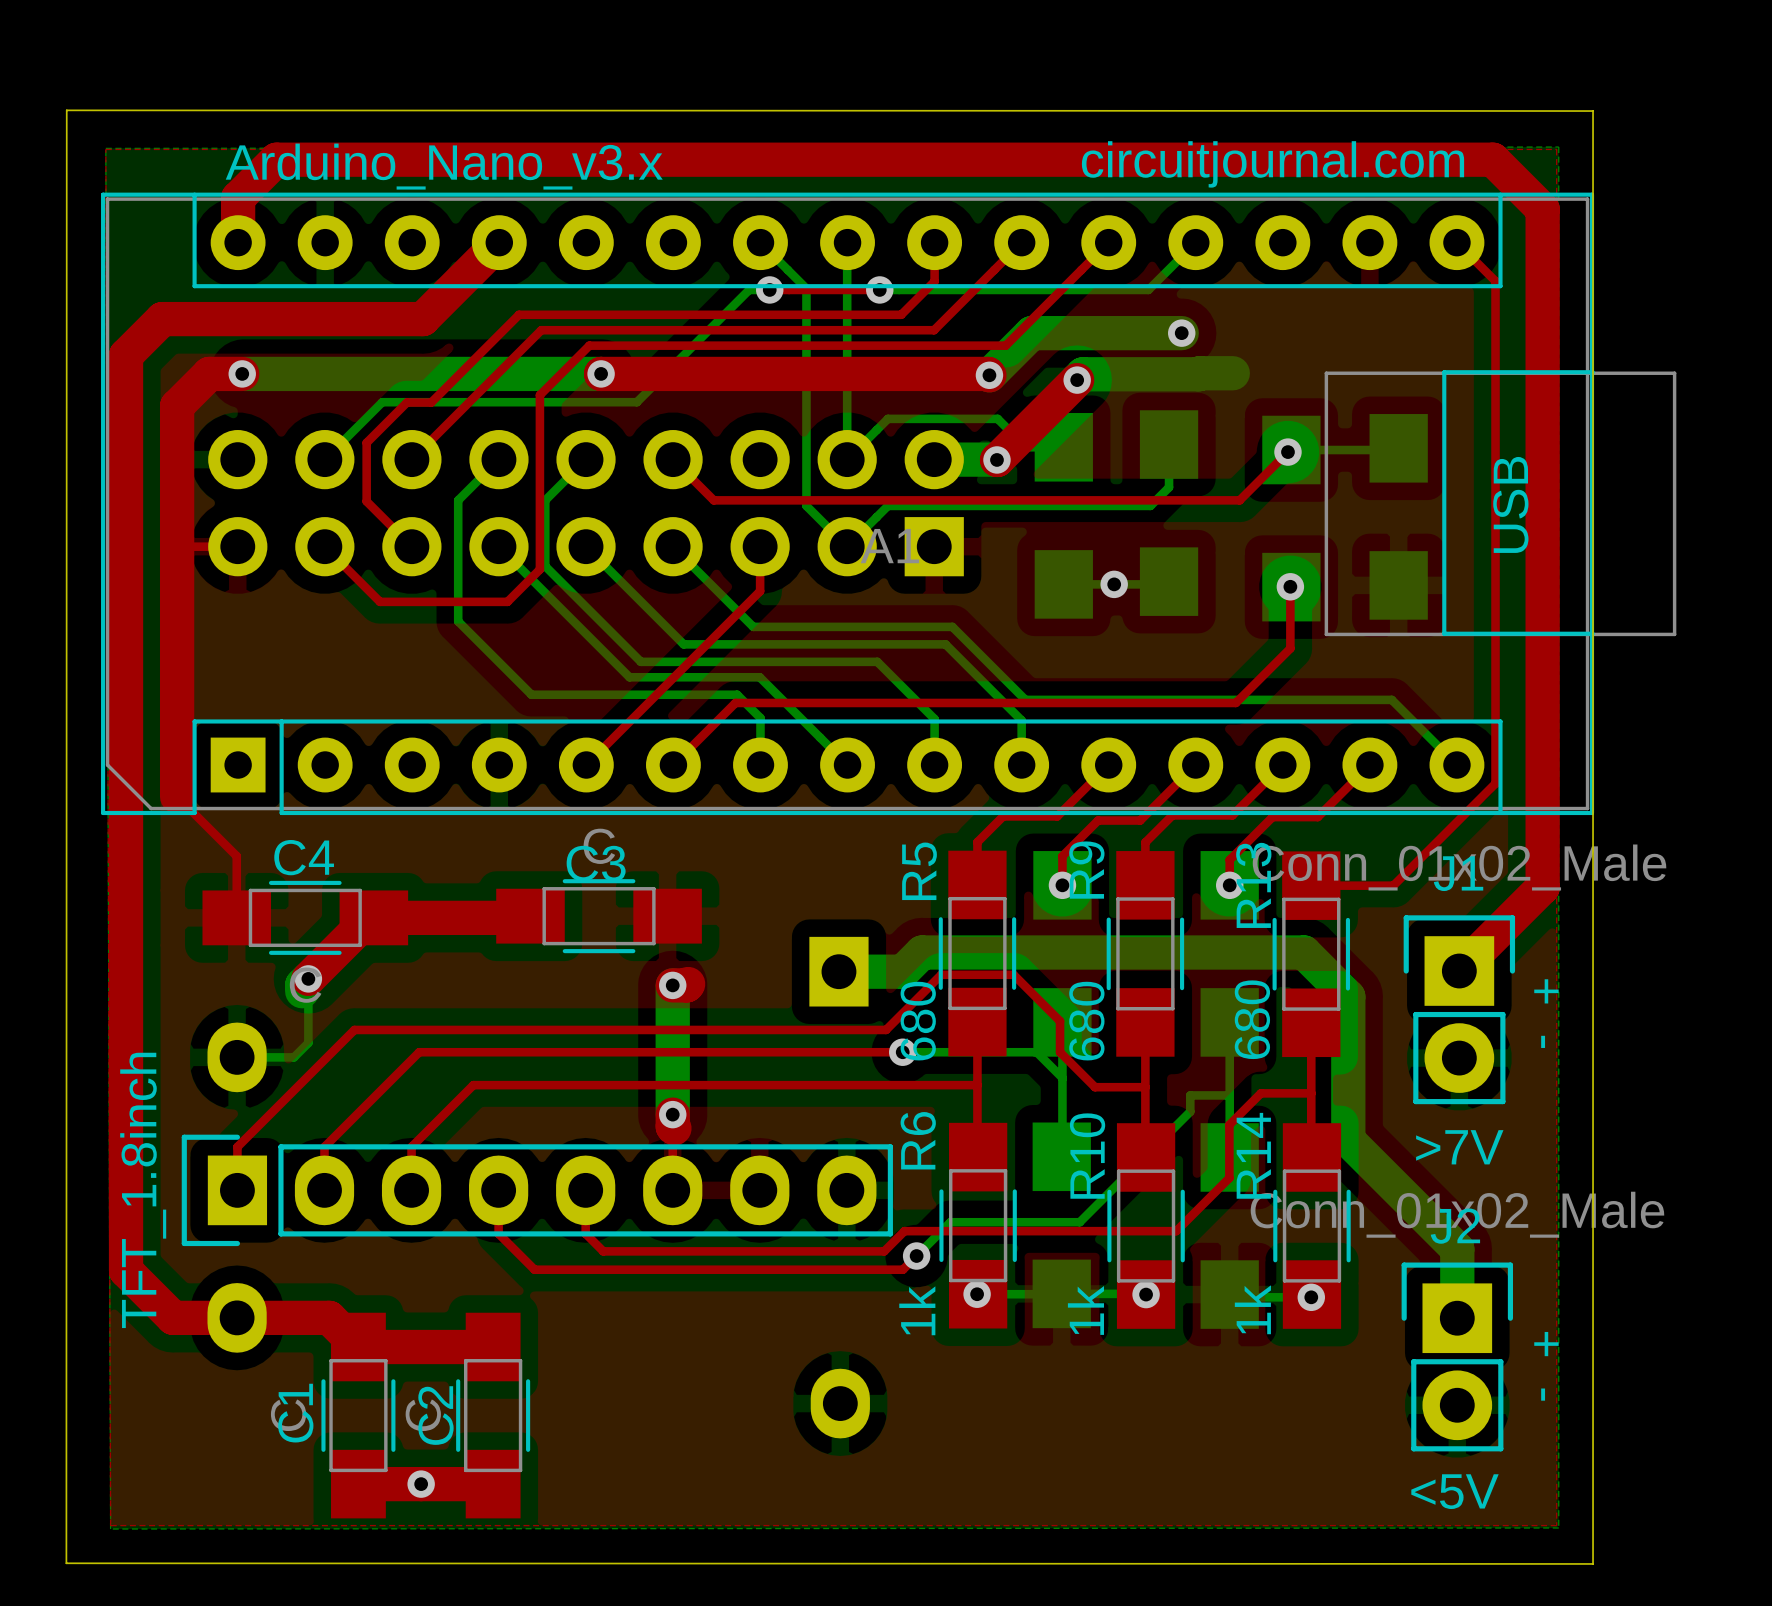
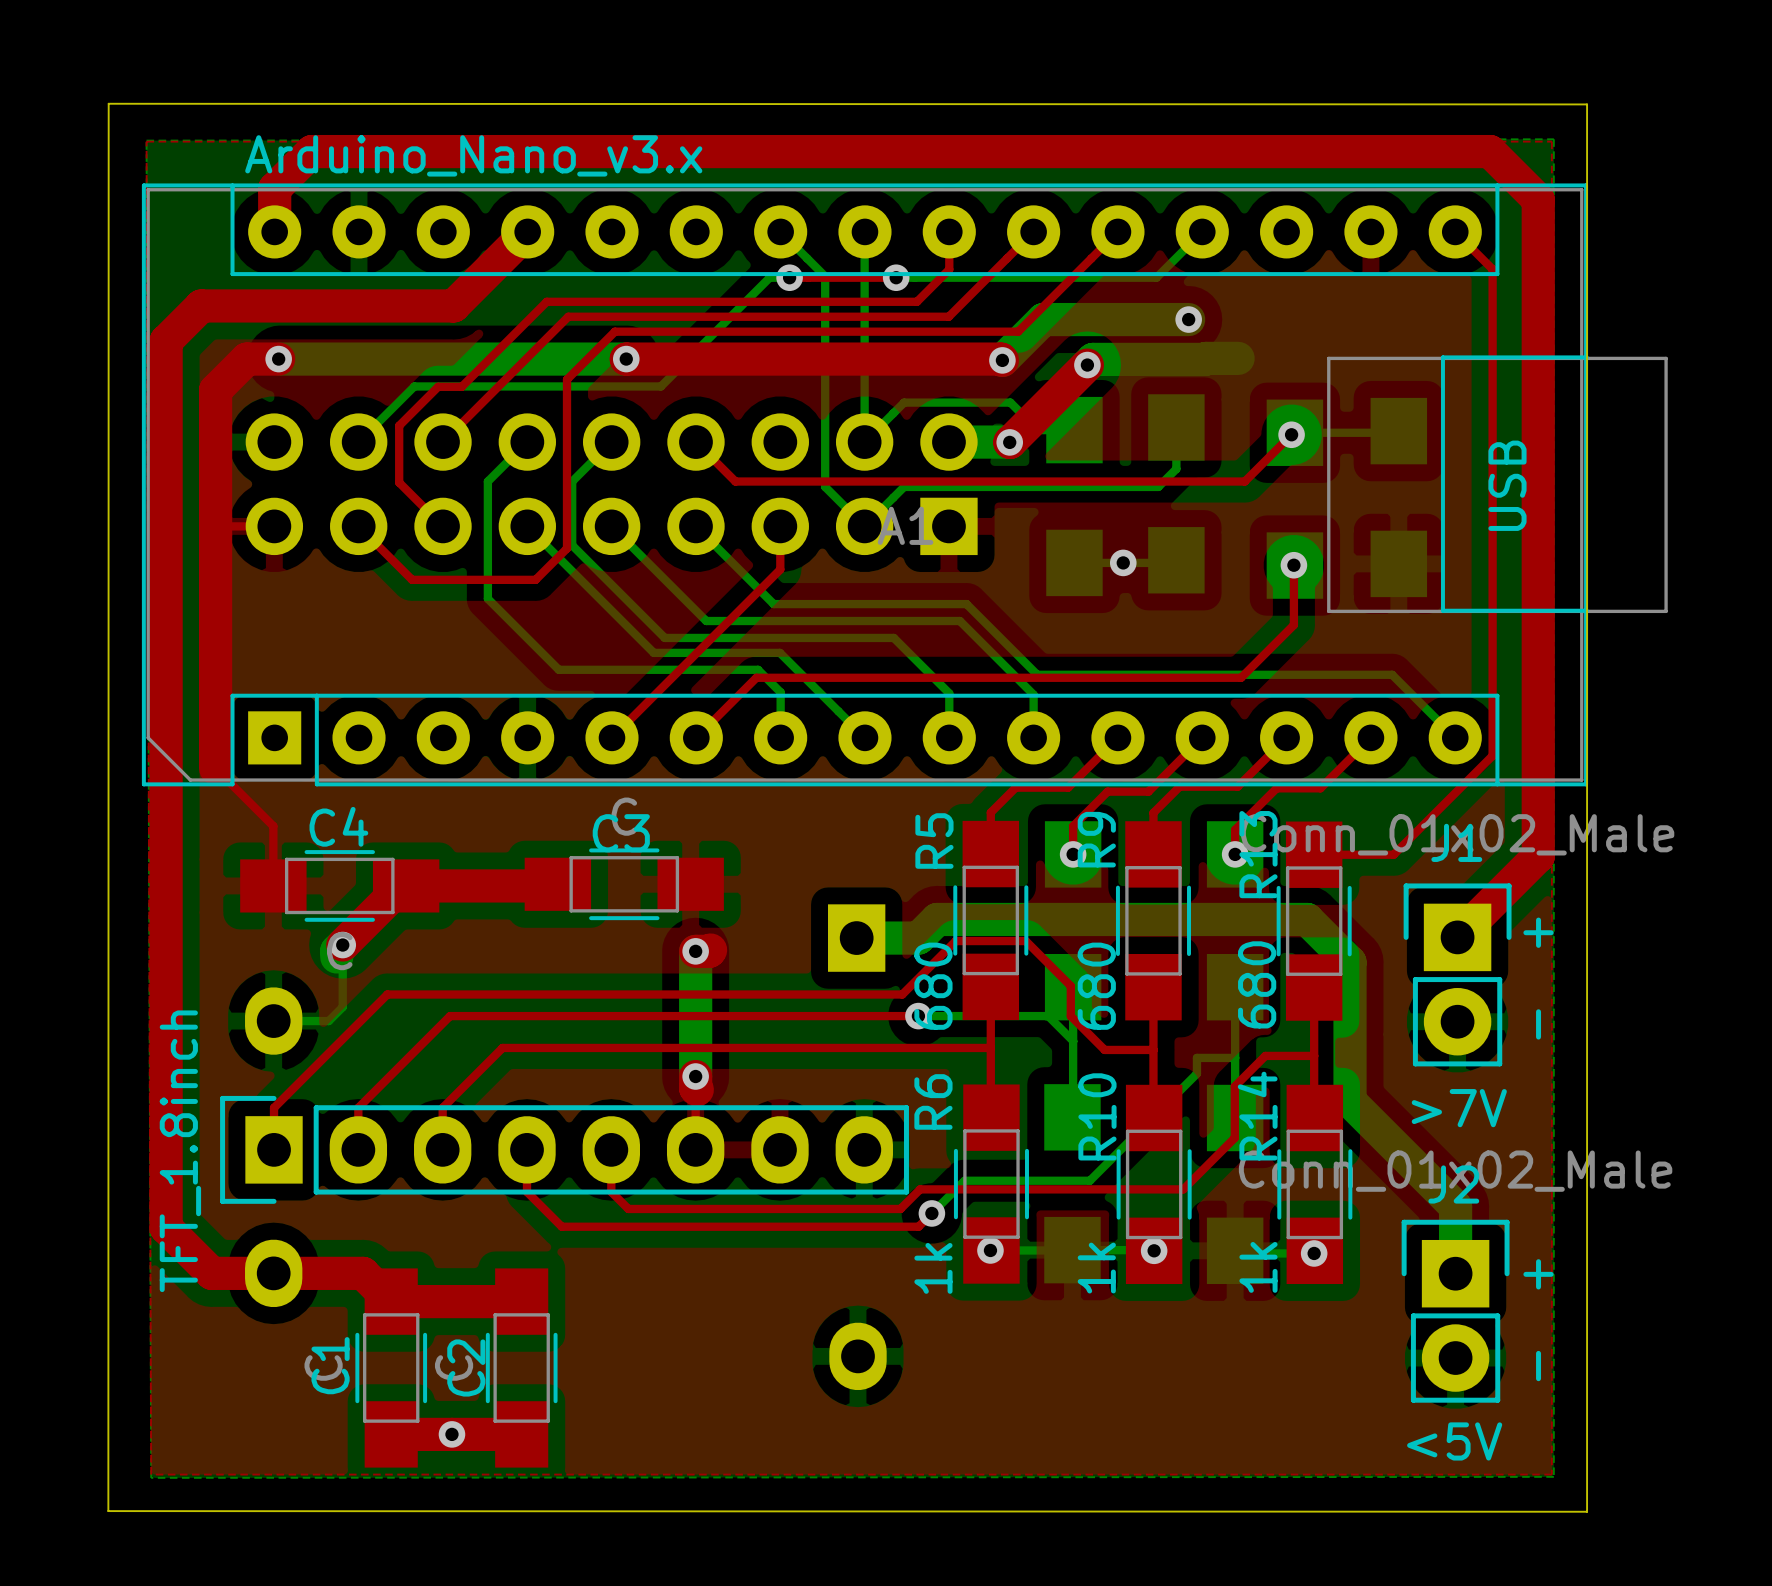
text: circuitjournal.com (1273, 164) -> none

